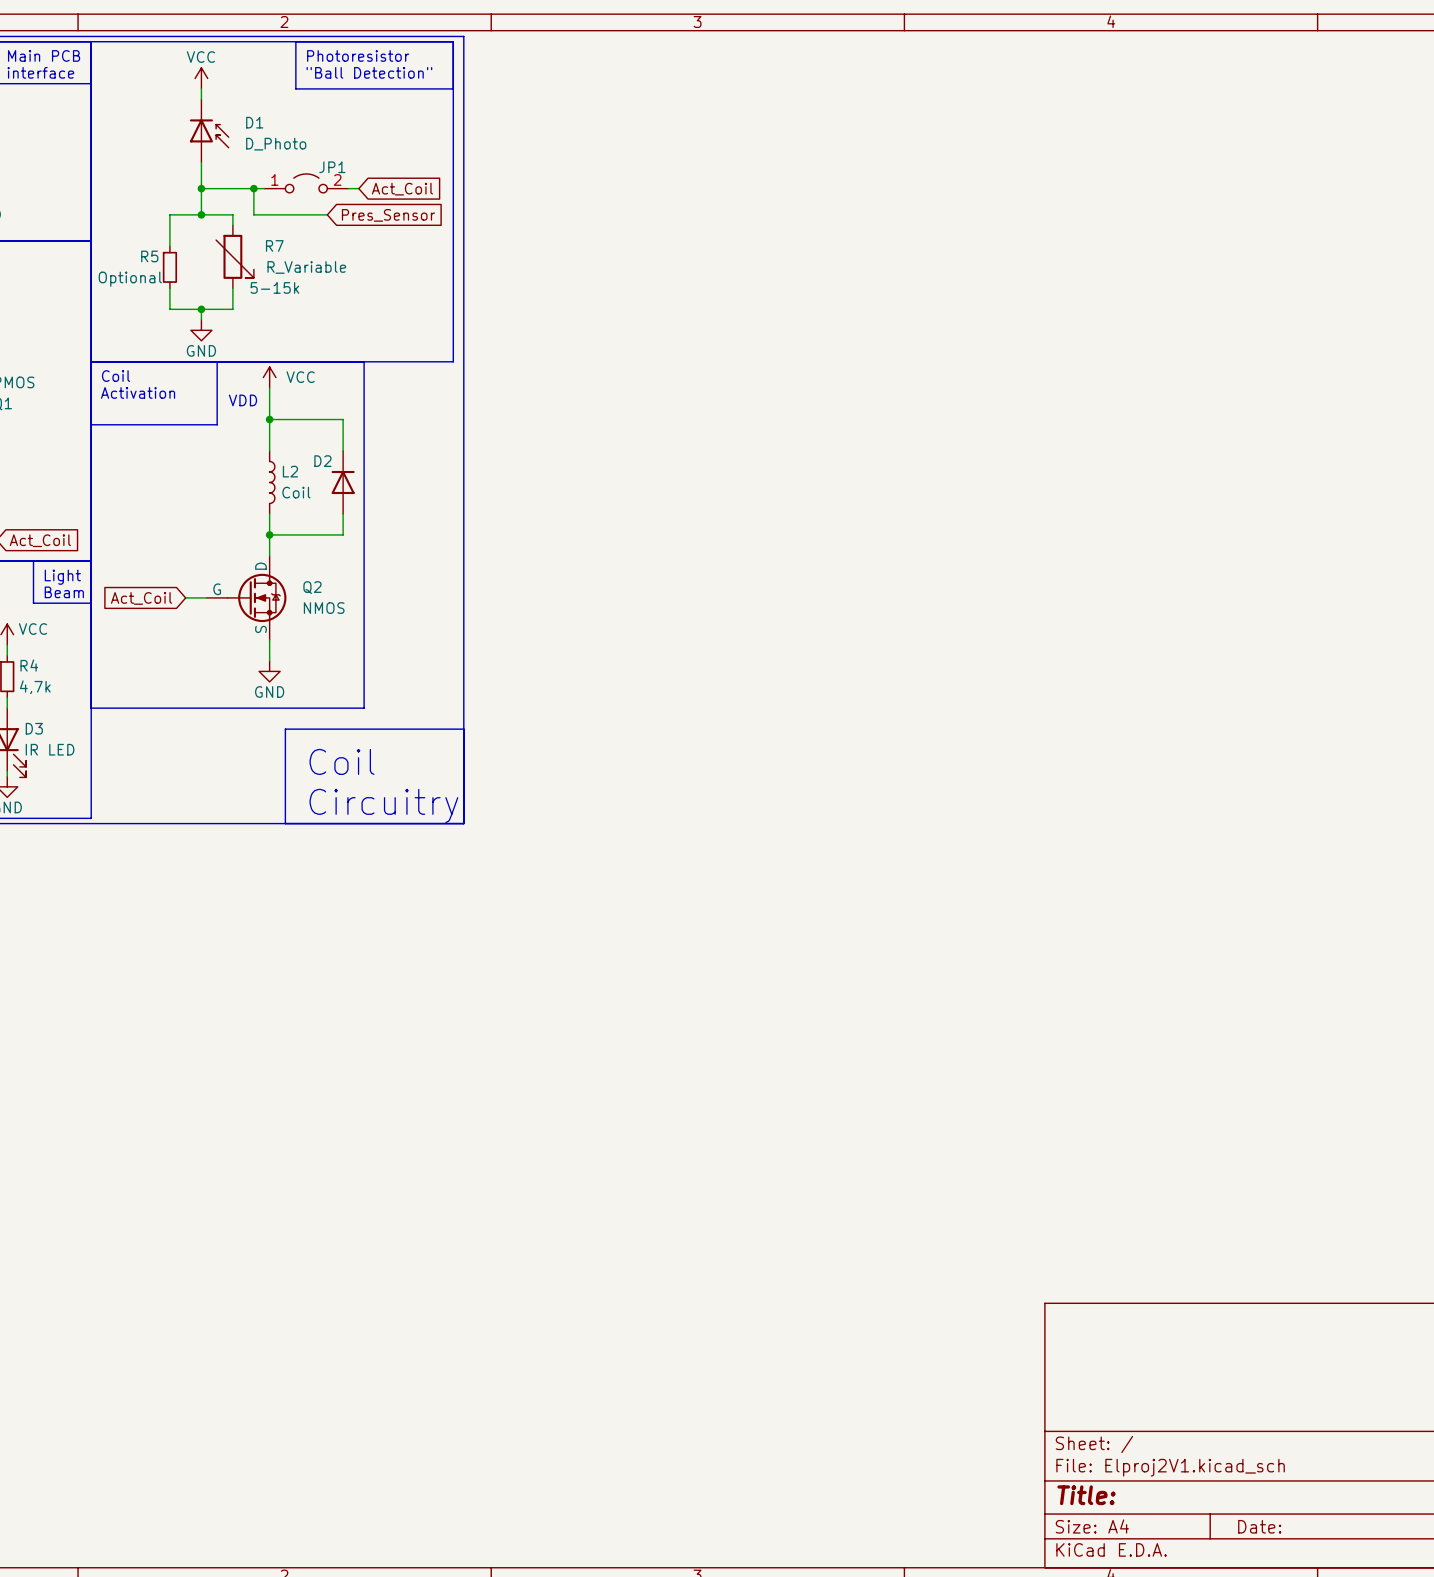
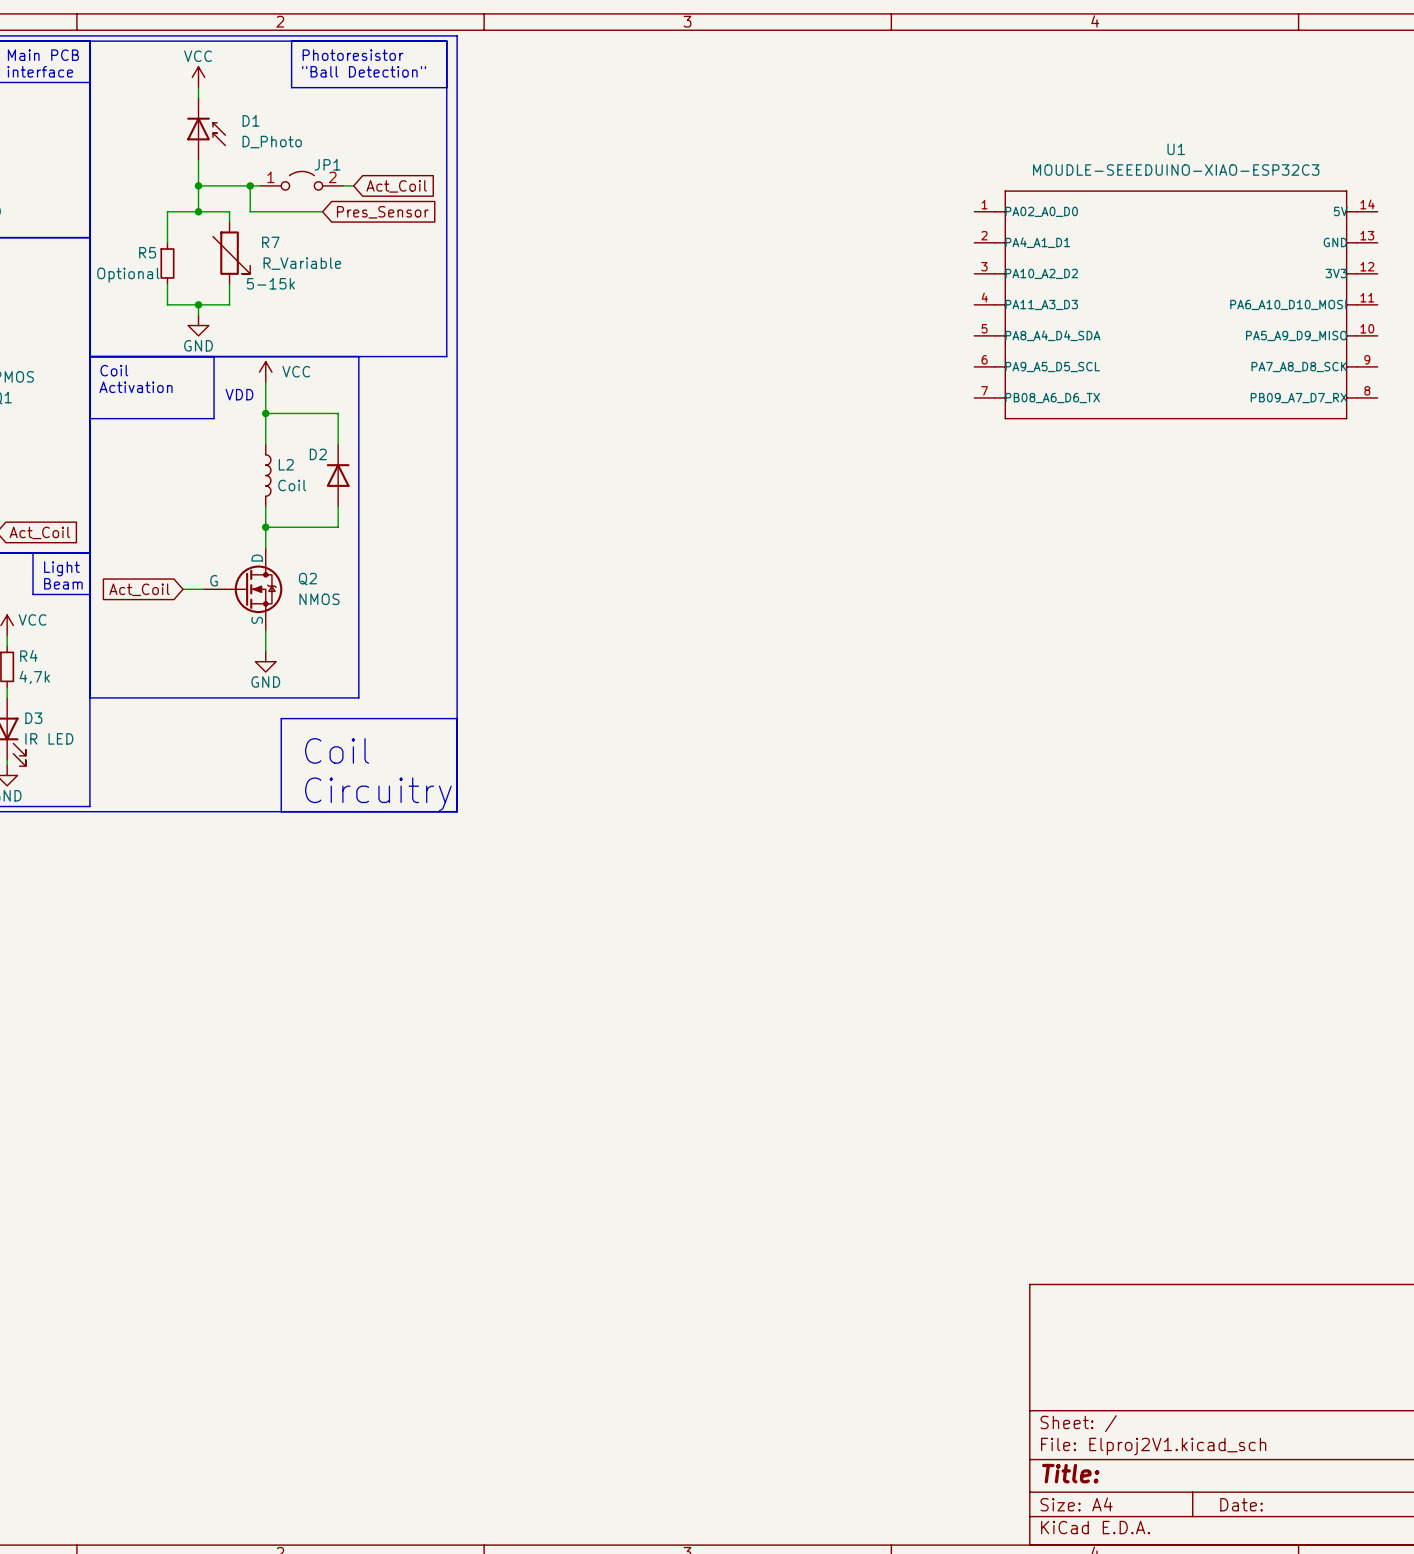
U1: none -> MOUDLE-SEEEDUINO-XIAO-ESP32C3 (1175, 304)

